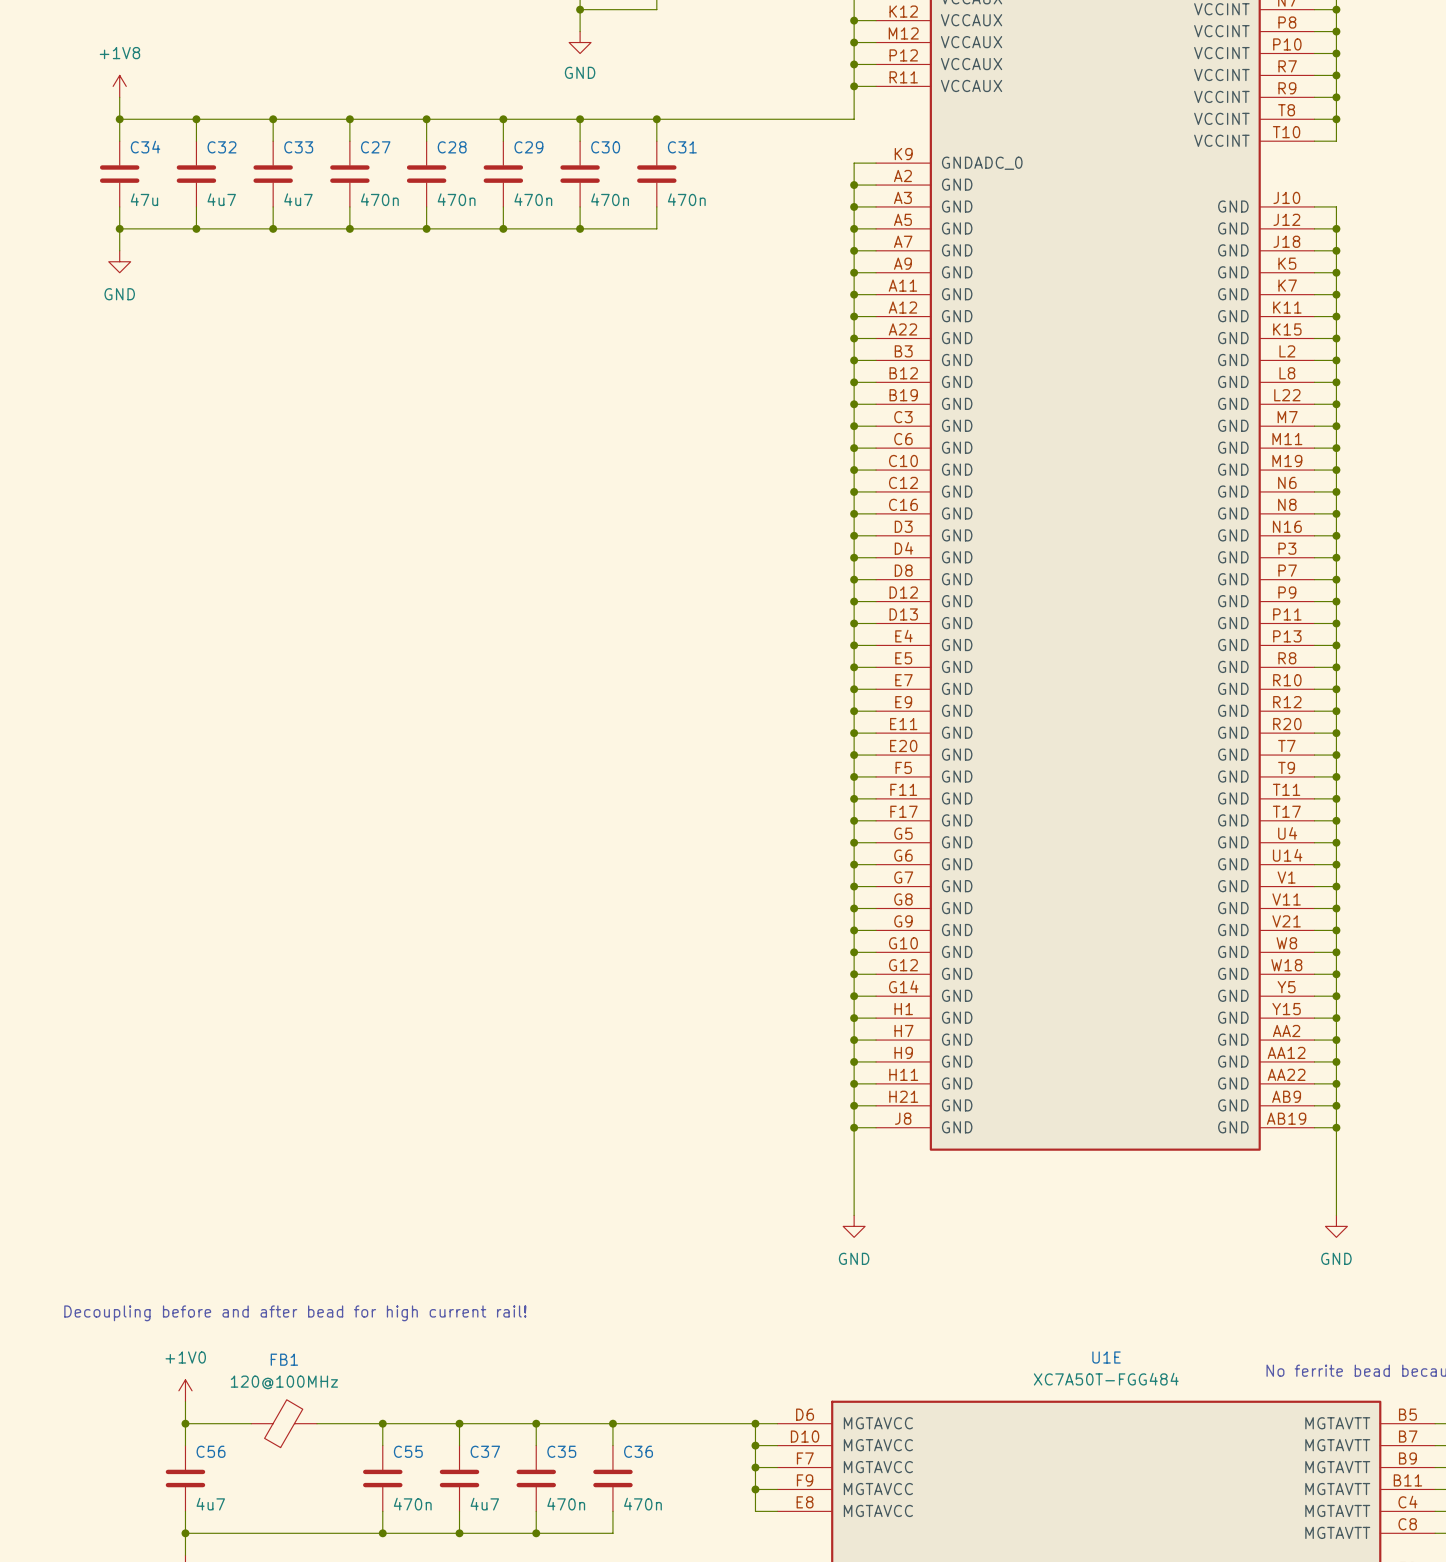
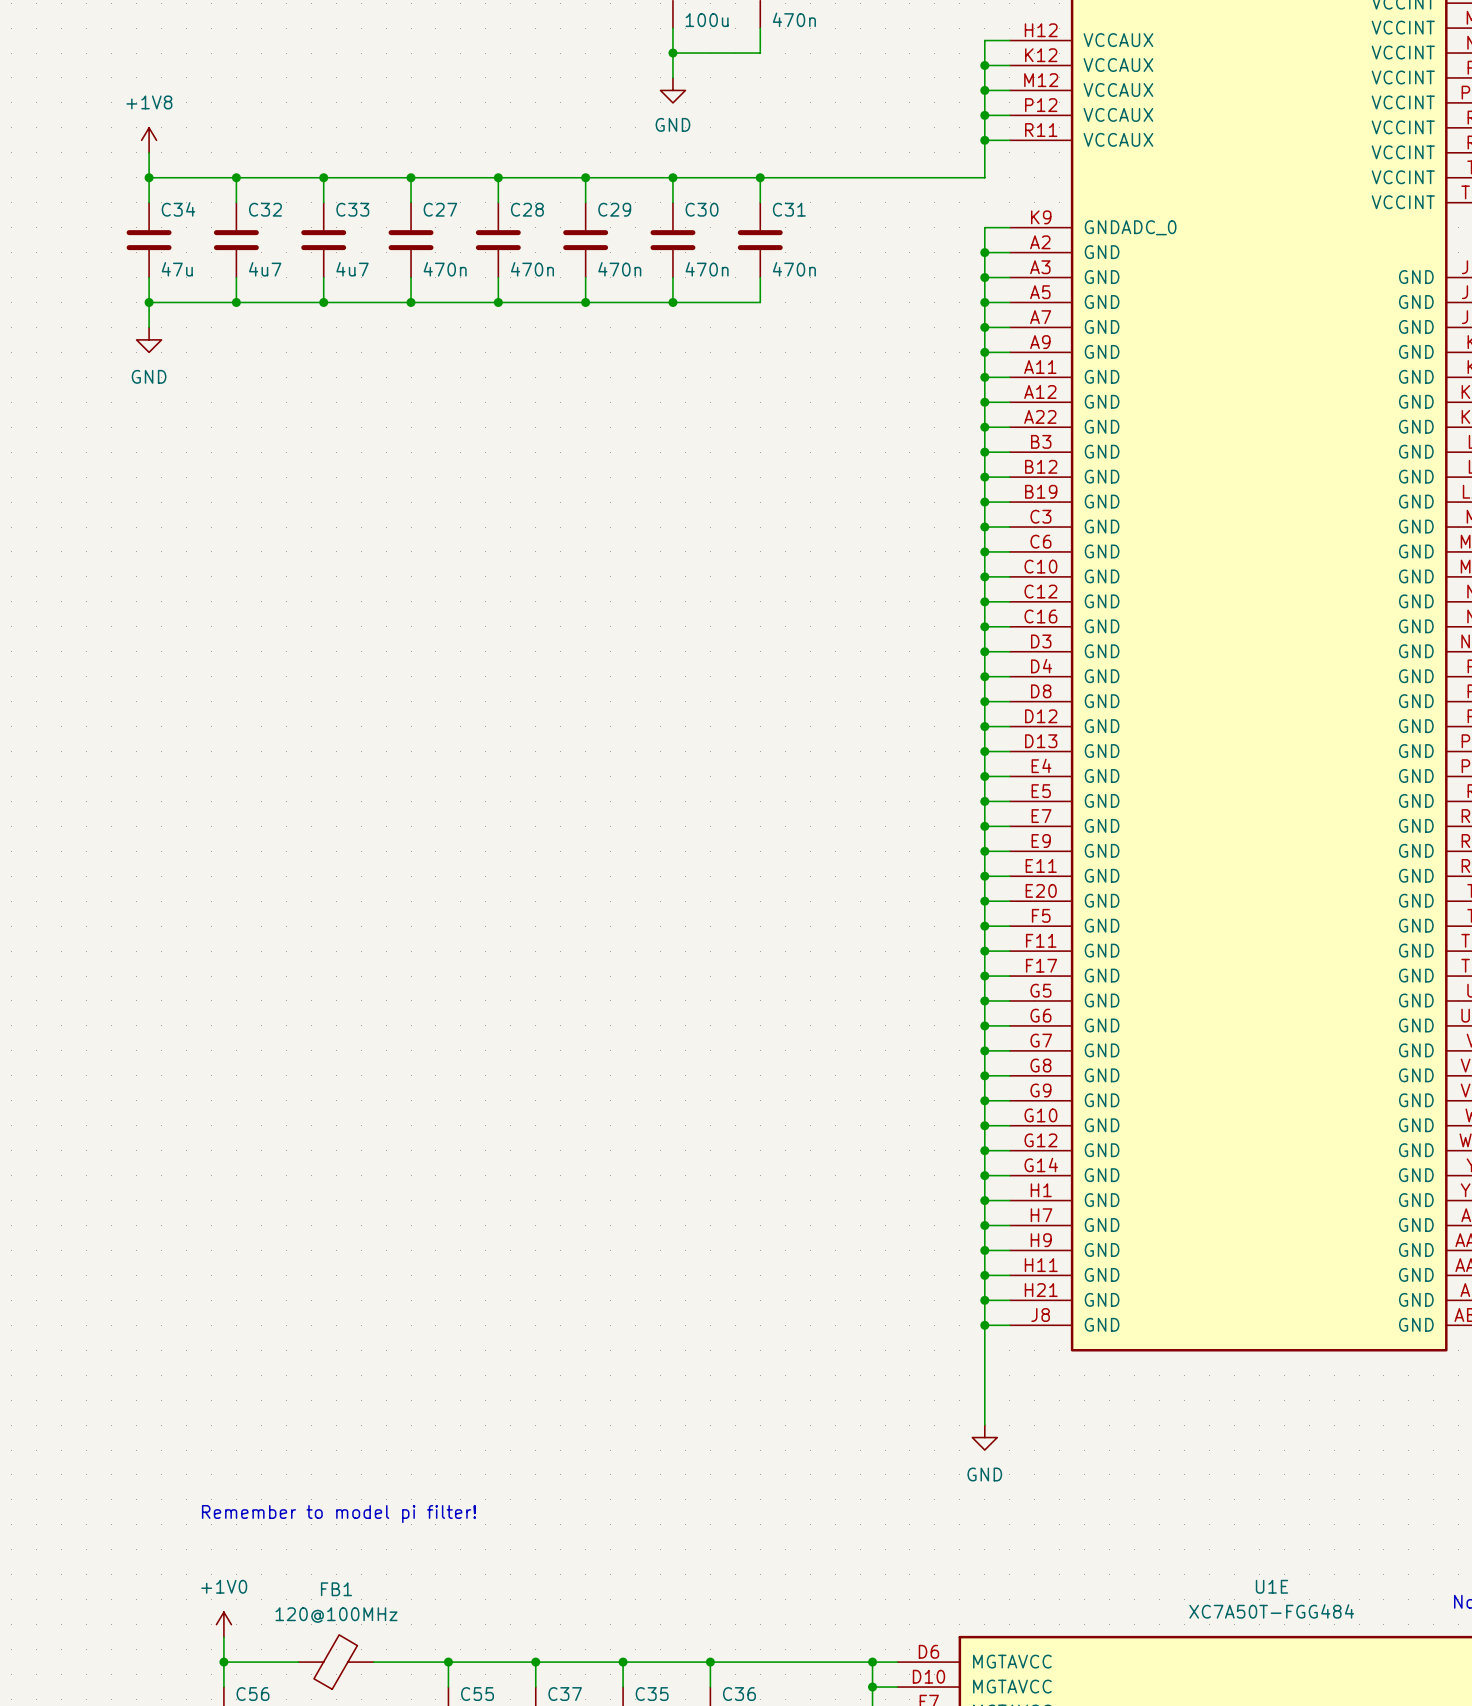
text: none -> Remember to model pi filter! (338, 1514)
text: Decoupling before and after bead for high current rail! (295, 1313) -> none

